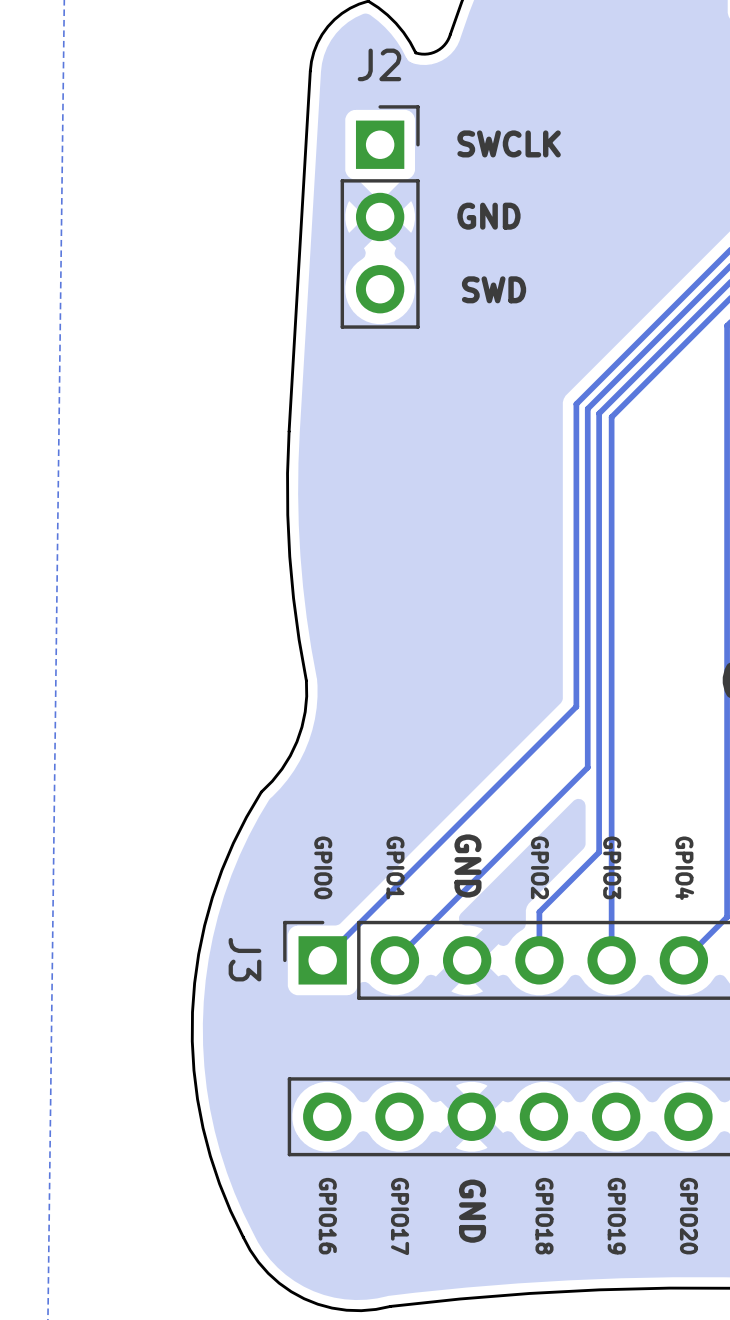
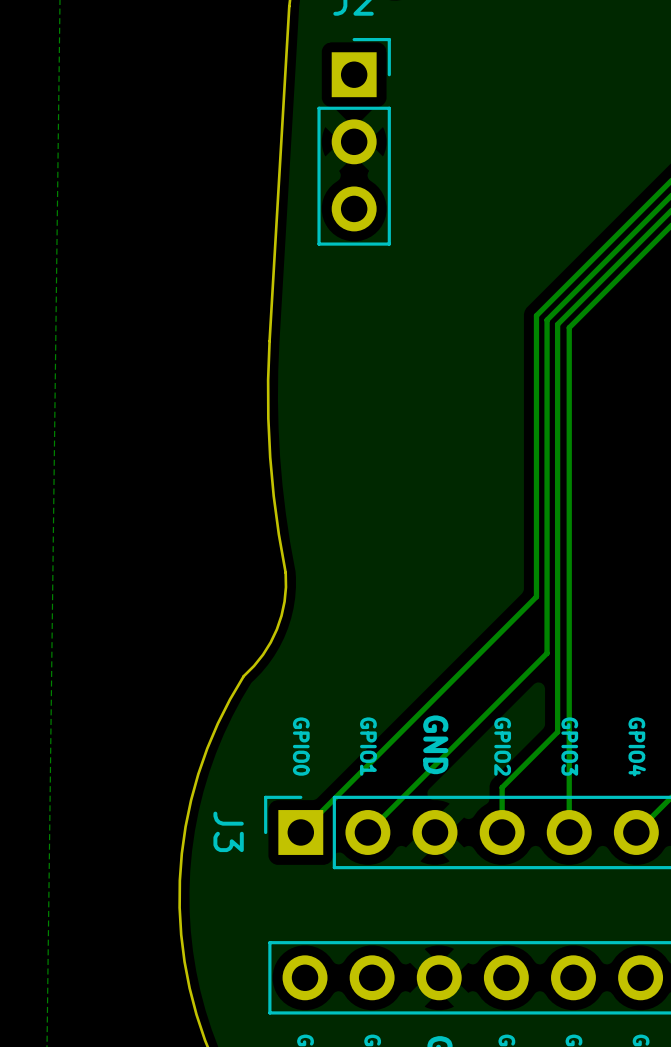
text: SWCLK (509, 143) -> none
text: GND (488, 216) -> none
text: SWD (494, 289) -> none

